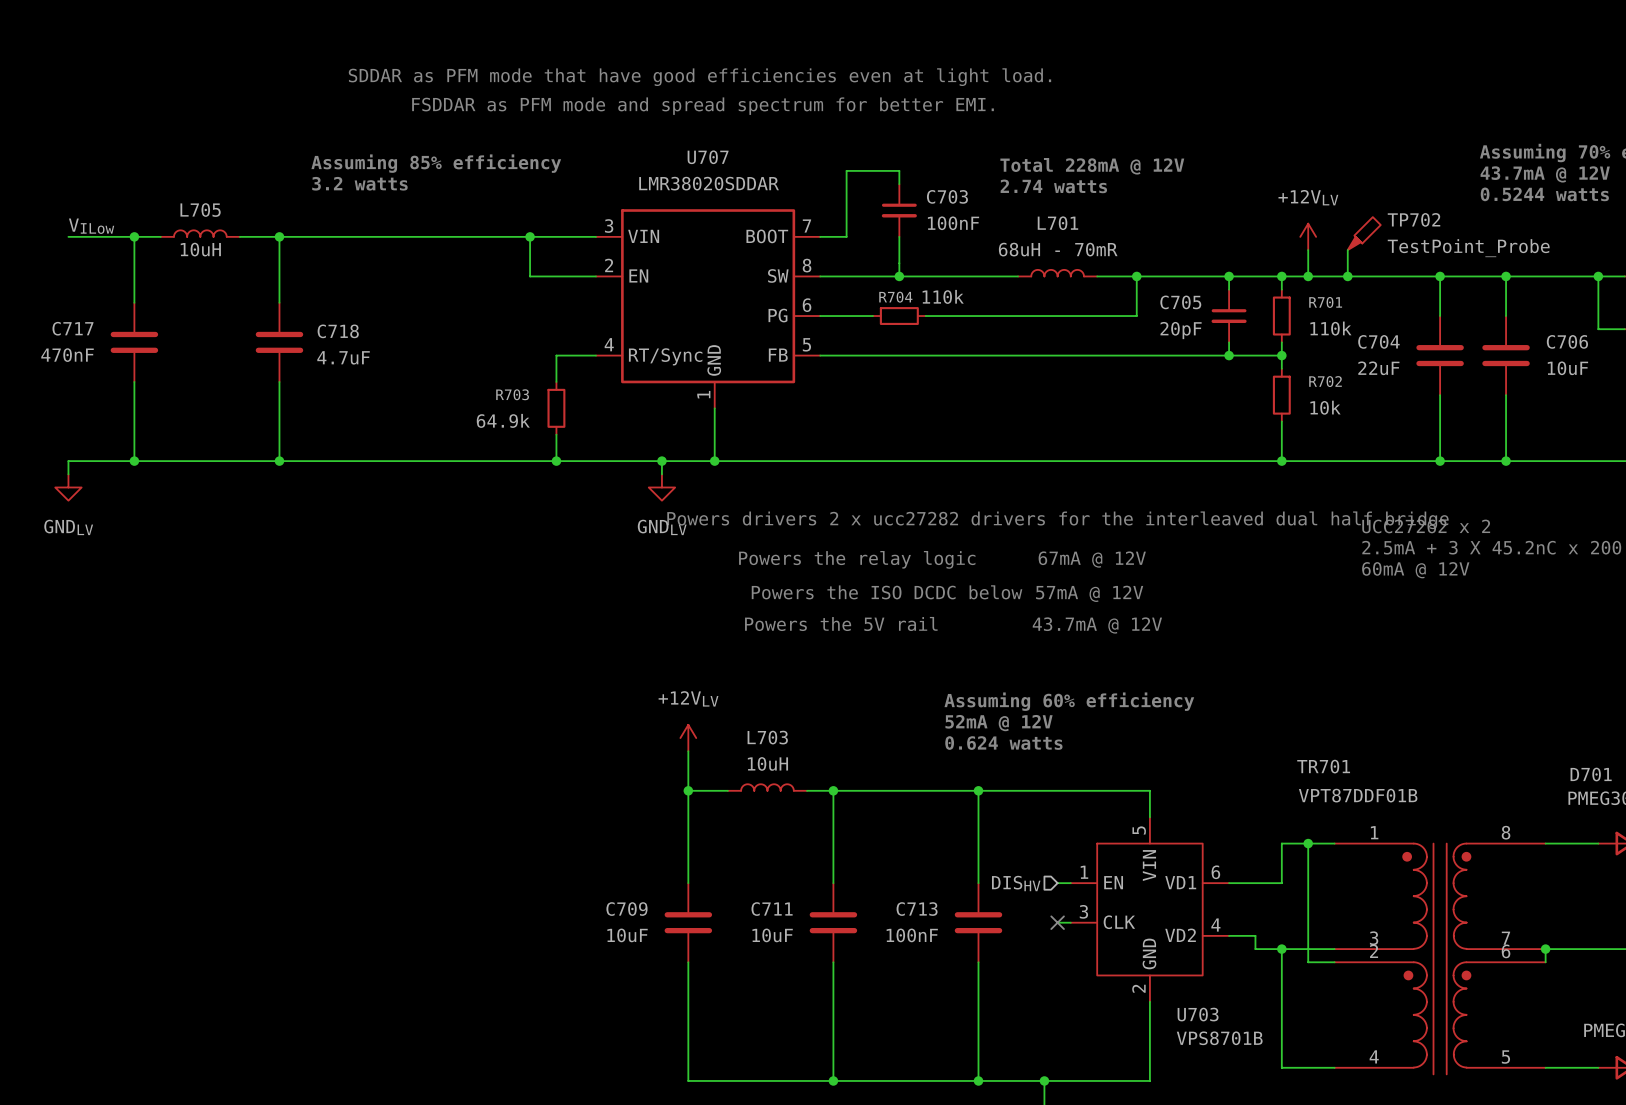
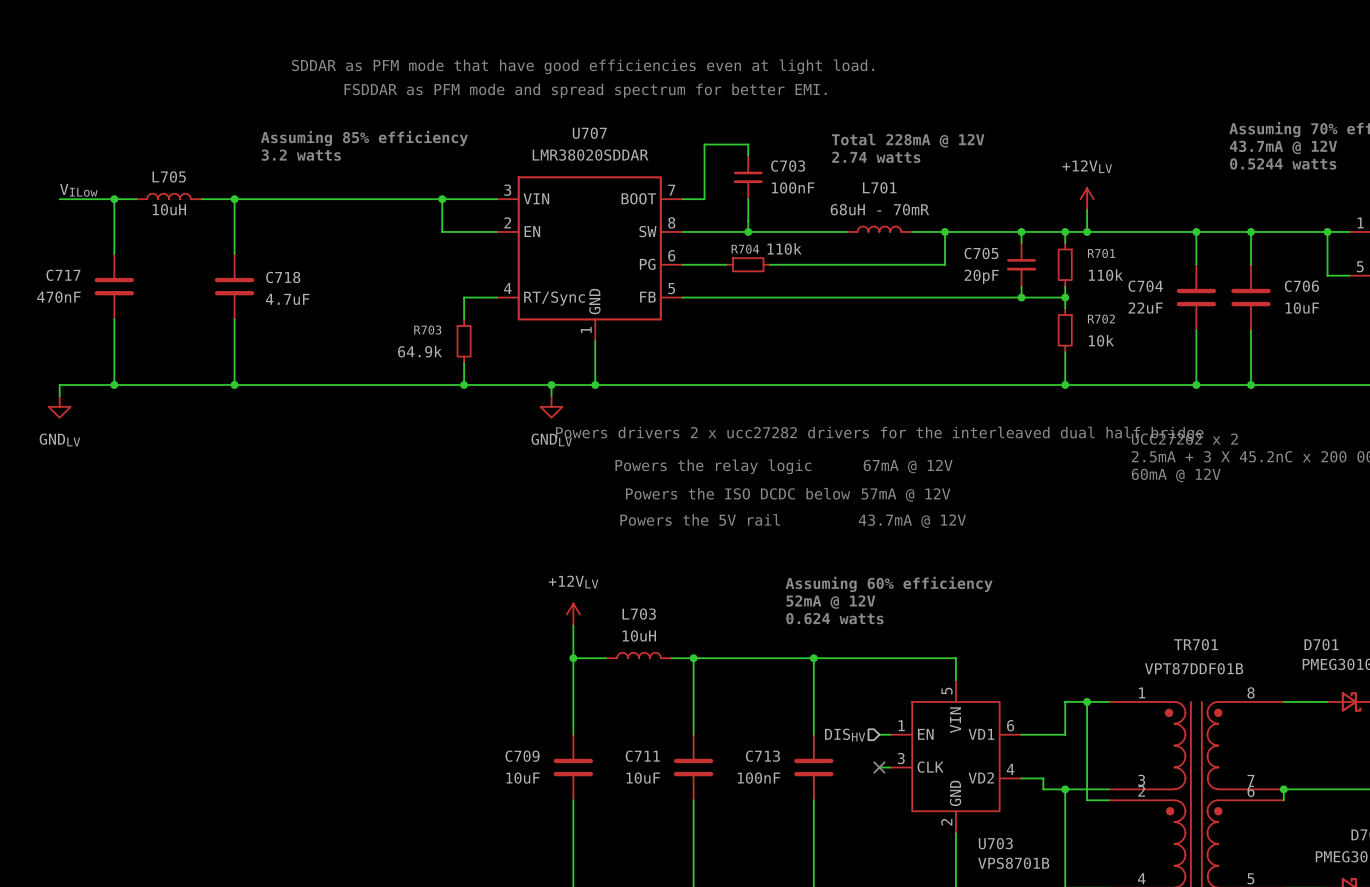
TP702: TestPoint_Probe (1364, 233) -> none
wire: (1347, 250) (1347, 276) -> none
junction: (1347, 276) -> none
TR701 name position: TR701 (1323, 766) -> TR701 (1196, 644)
TR701 value position: VPT87DDF01B (1358, 795) -> VPT87DDF01B (1194, 668)

